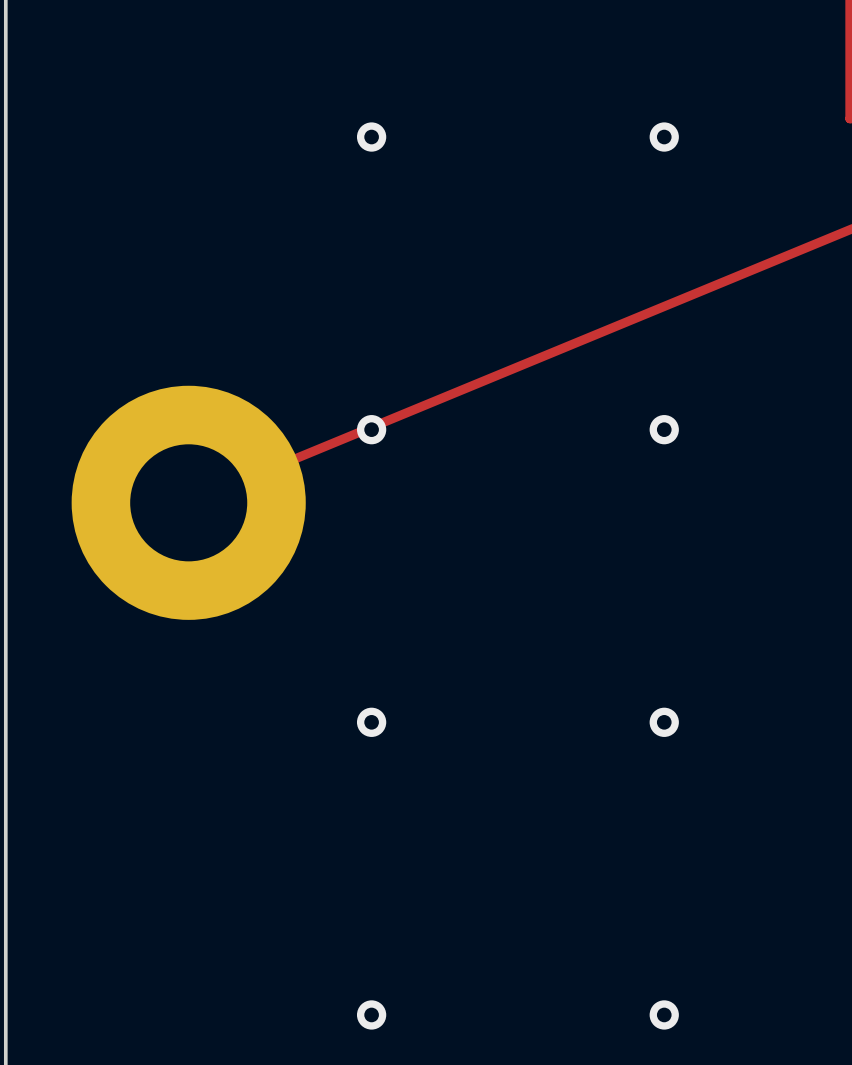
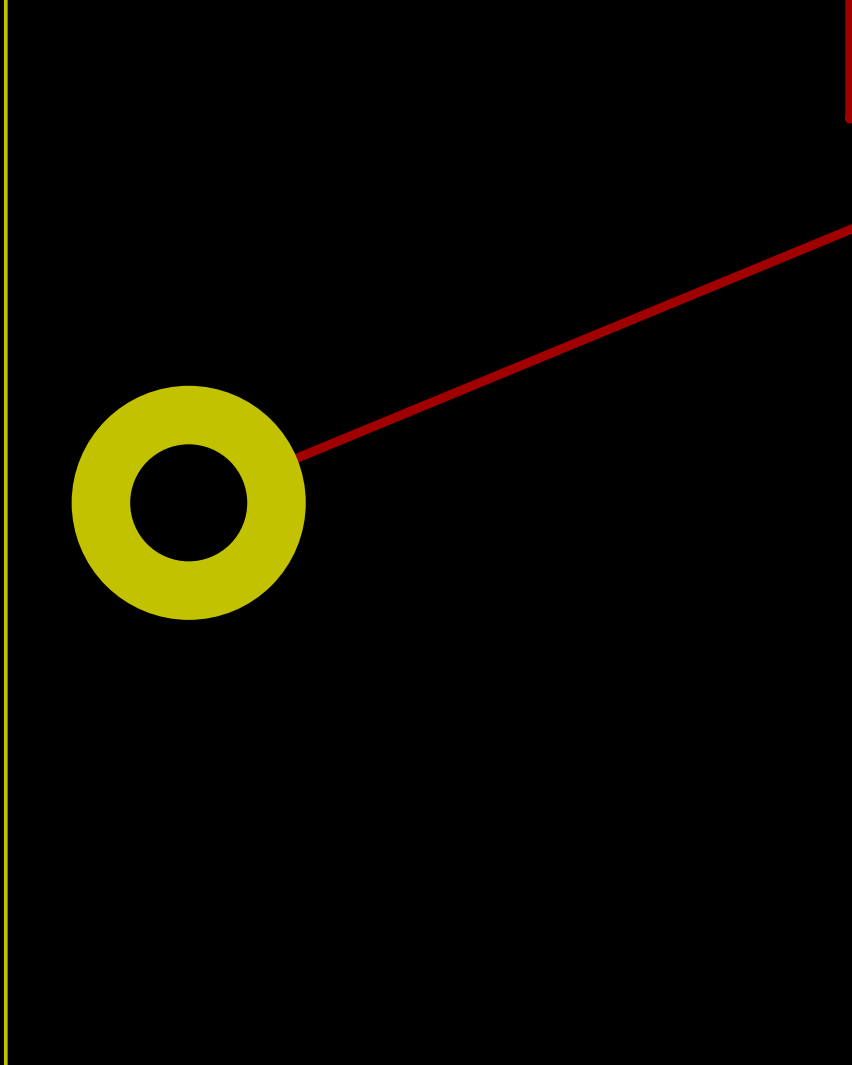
via: (371, 137) -> none
via: (664, 137) -> none
via: (371, 429) -> none
via: (664, 429) -> none
via: (371, 722) -> none
via: (664, 722) -> none
via: (371, 1014) -> none
via: (664, 1014) -> none

